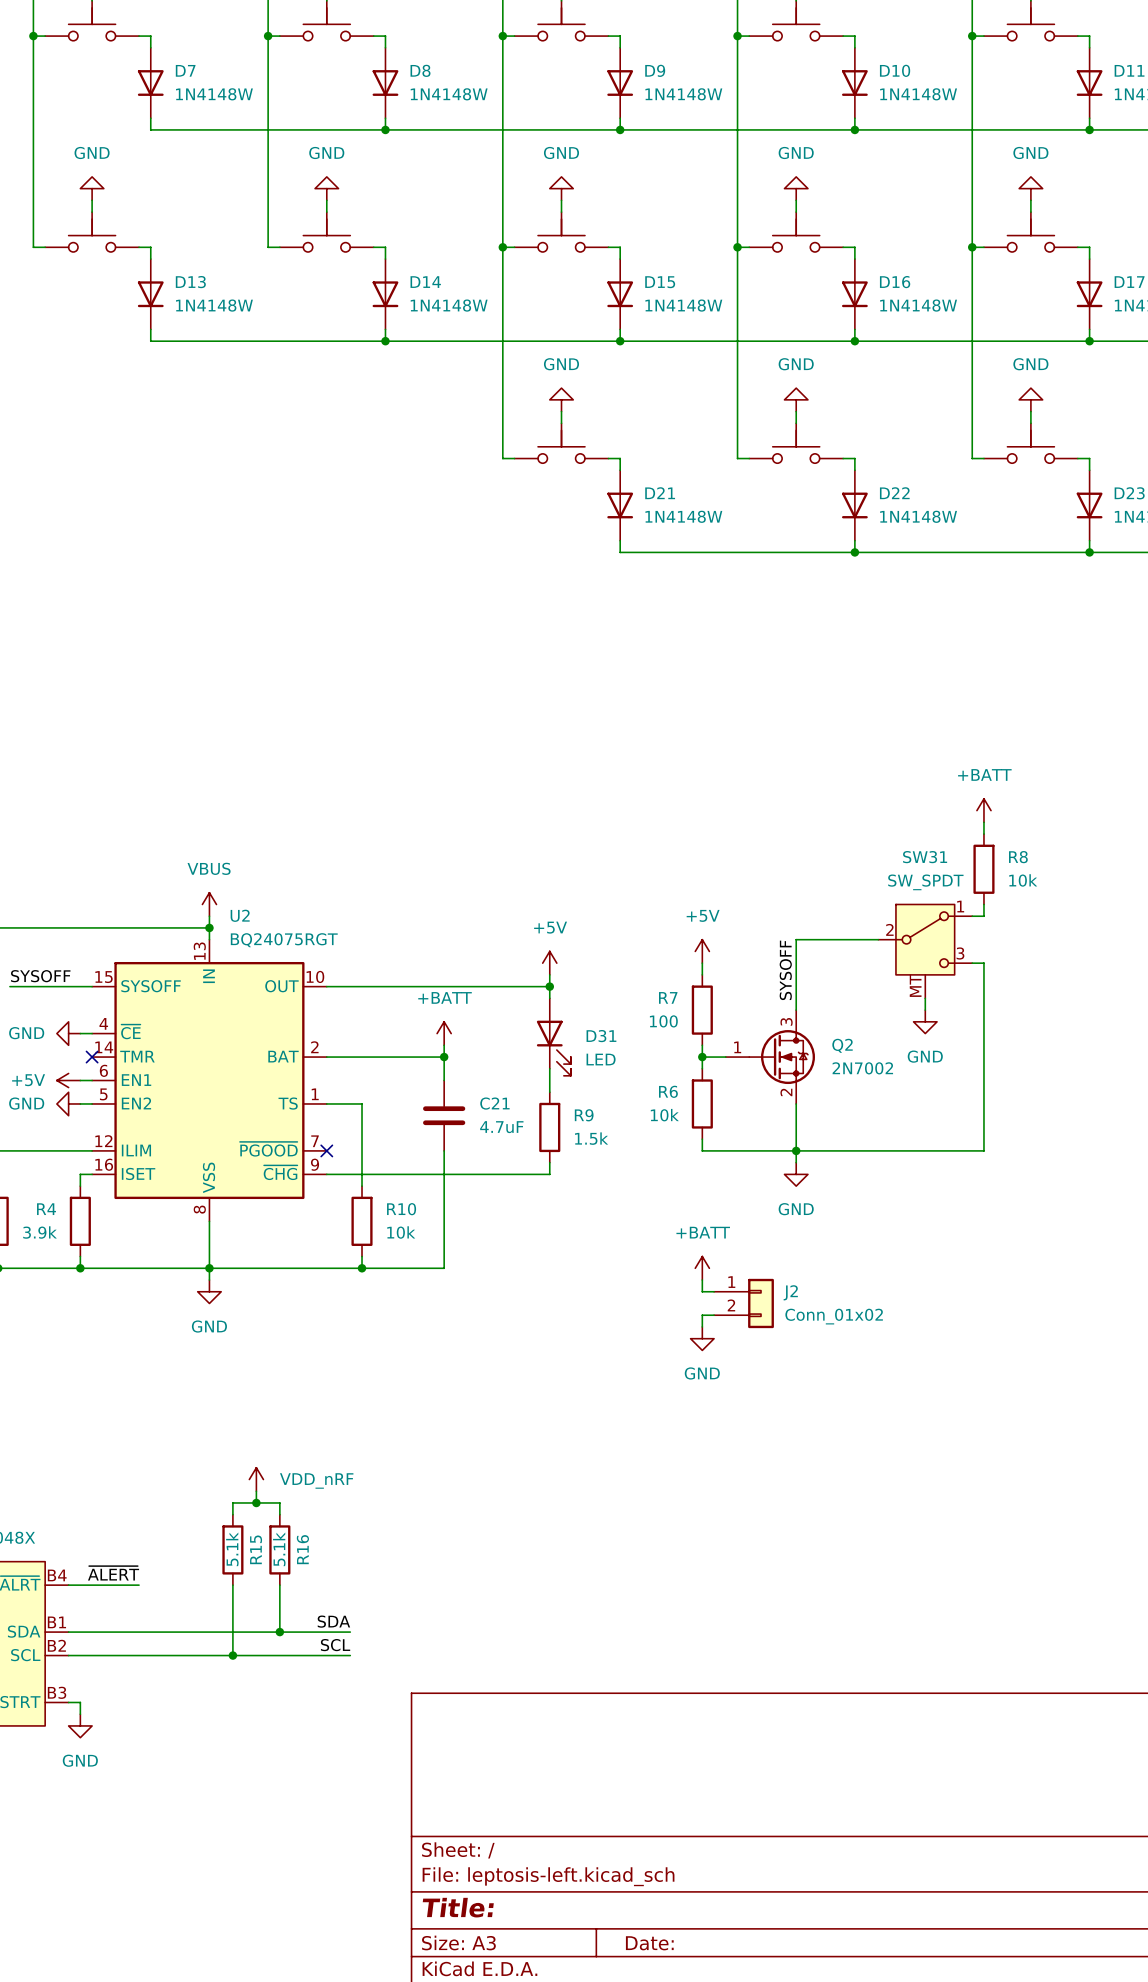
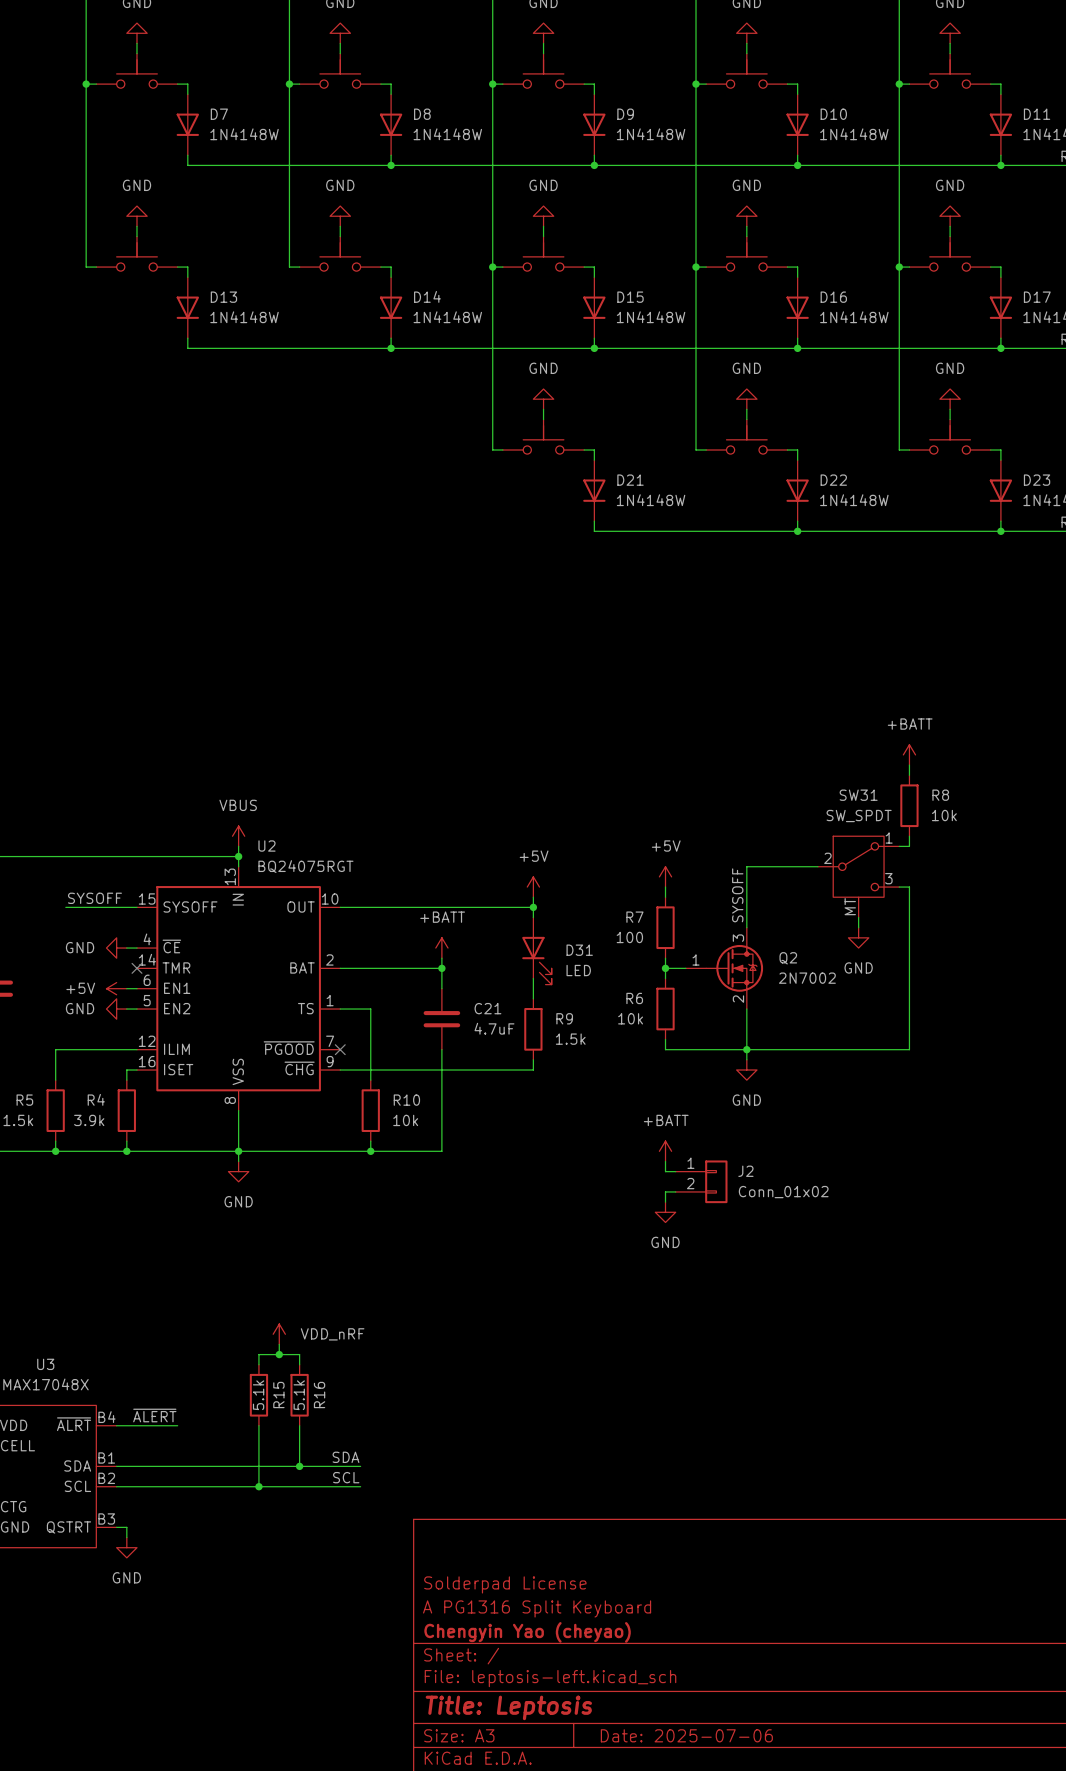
title block: none -> Solderpad License (505, 1584)
title block: none -> A PG1316 Split Keyboard (537, 1608)
title block: none -> Chengyin Yao (cheyao) (527, 1632)
title block: Title: (458, 1907) -> Title: Leptosis (508, 1707)
title block: Date: (649, 1943) -> Date: 2025-07-06 (686, 1735)

